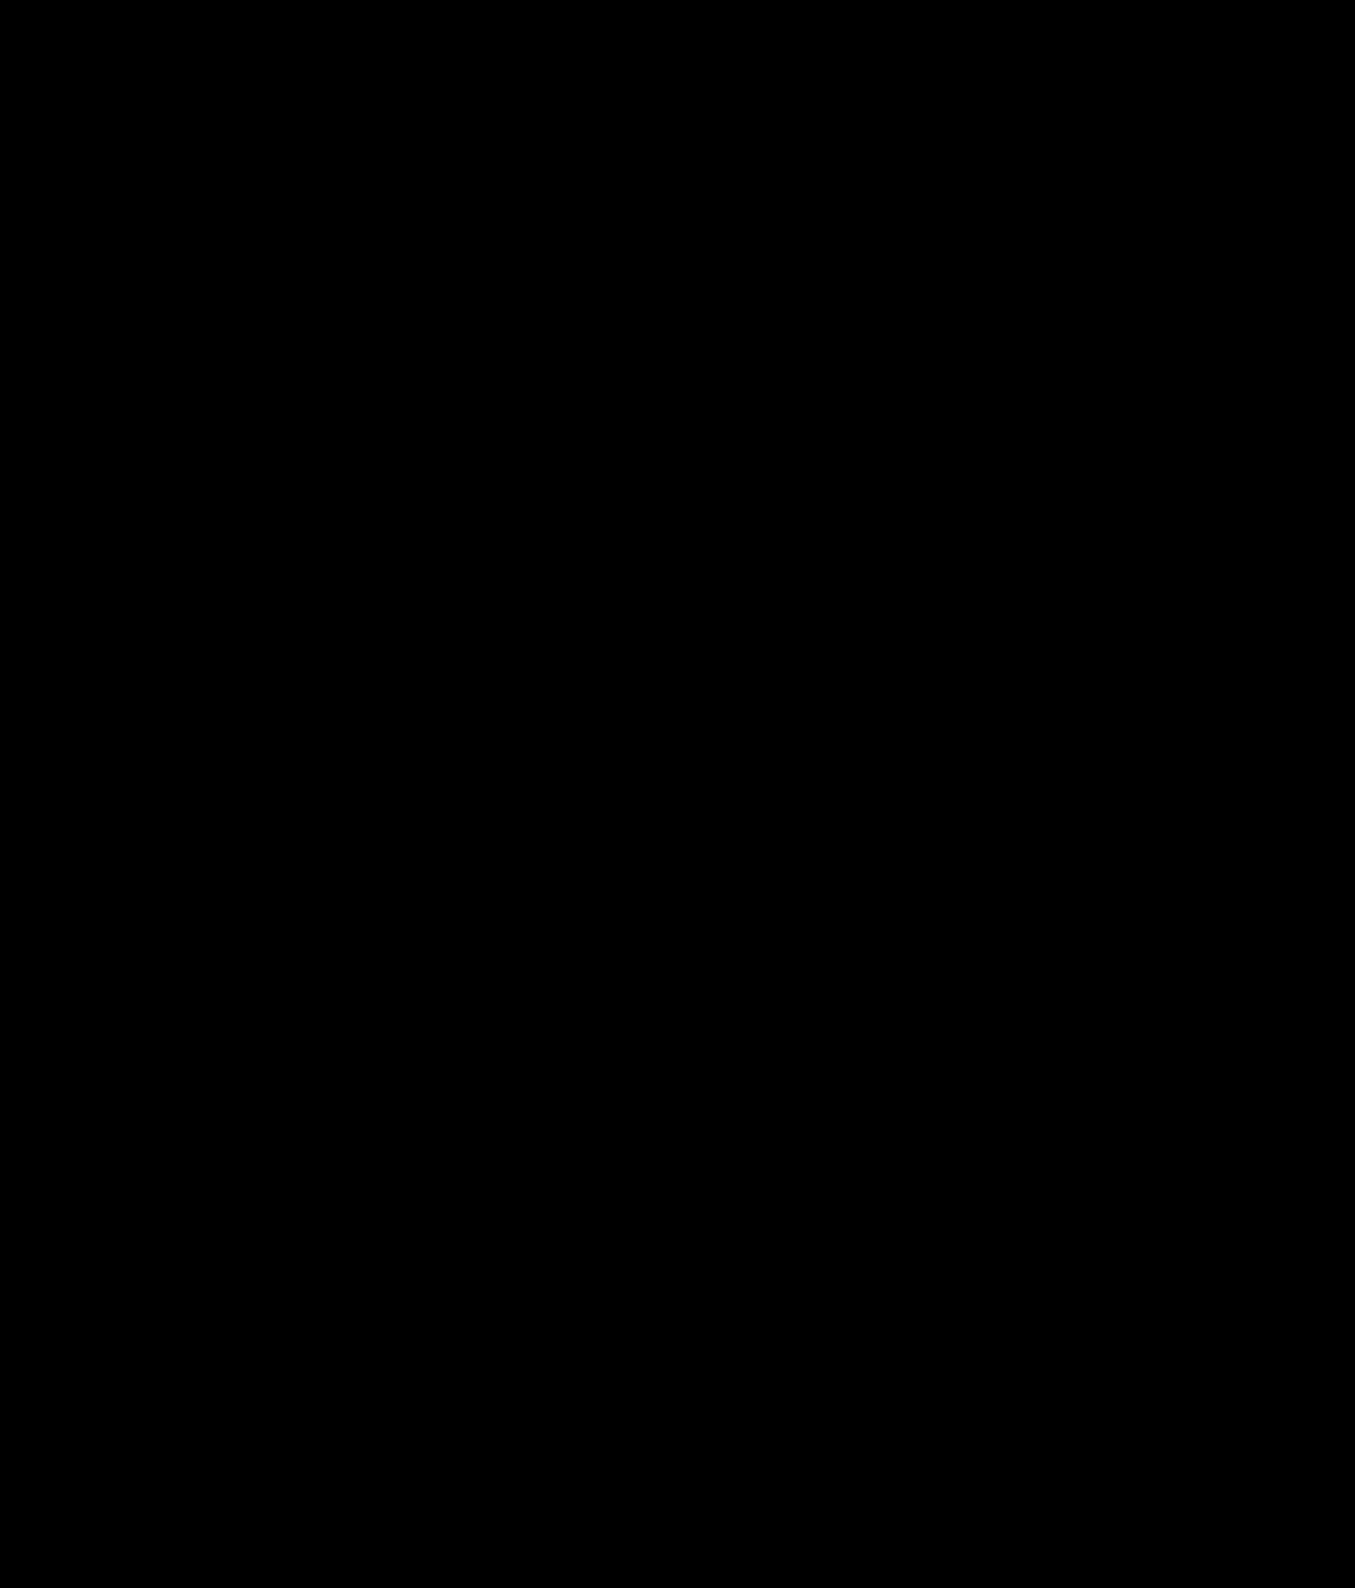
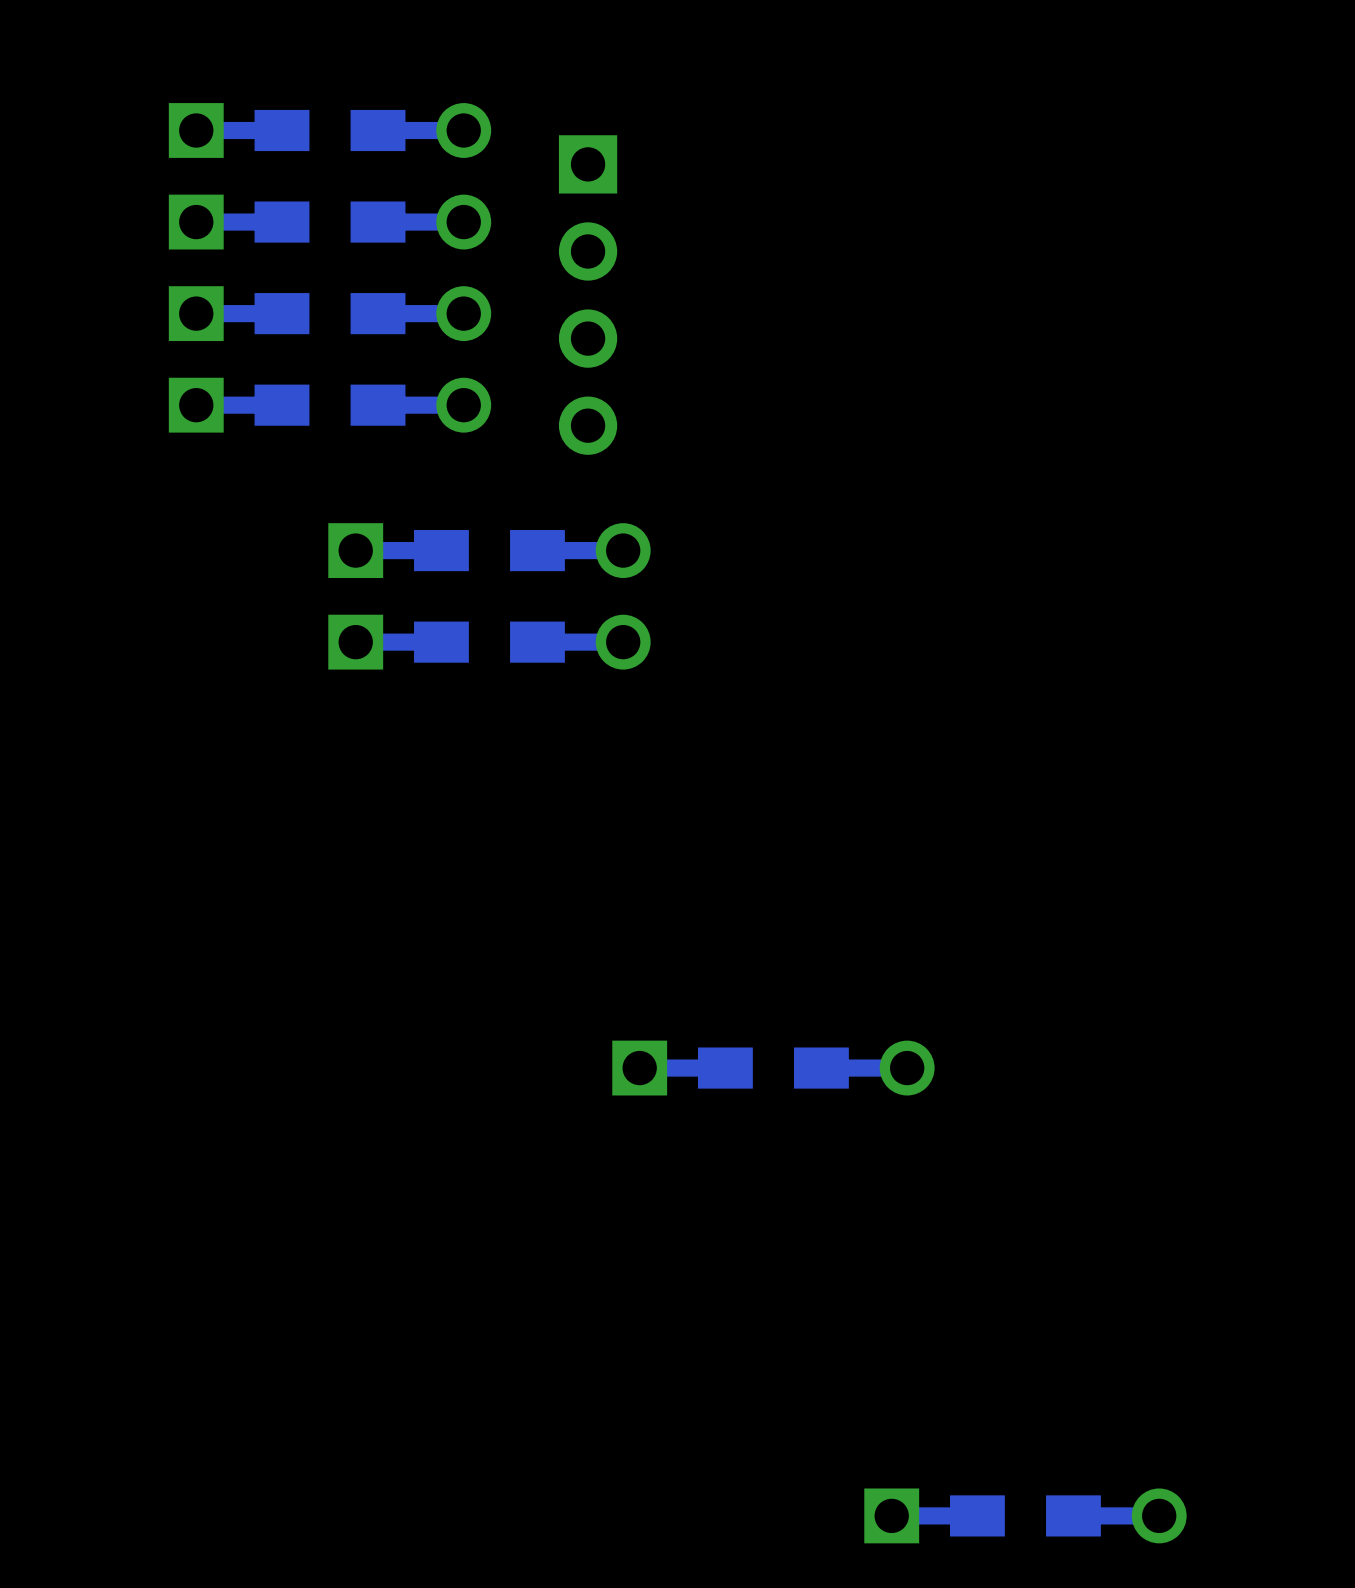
part: none -> (330, 130)
part: none -> (330, 222)
part: none -> (588, 295)
part: none -> (330, 313)
part: none -> (330, 405)
part: none -> (489, 550)
part: none -> (489, 642)
part: none -> (773, 1068)
part: none -> (1025, 1515)

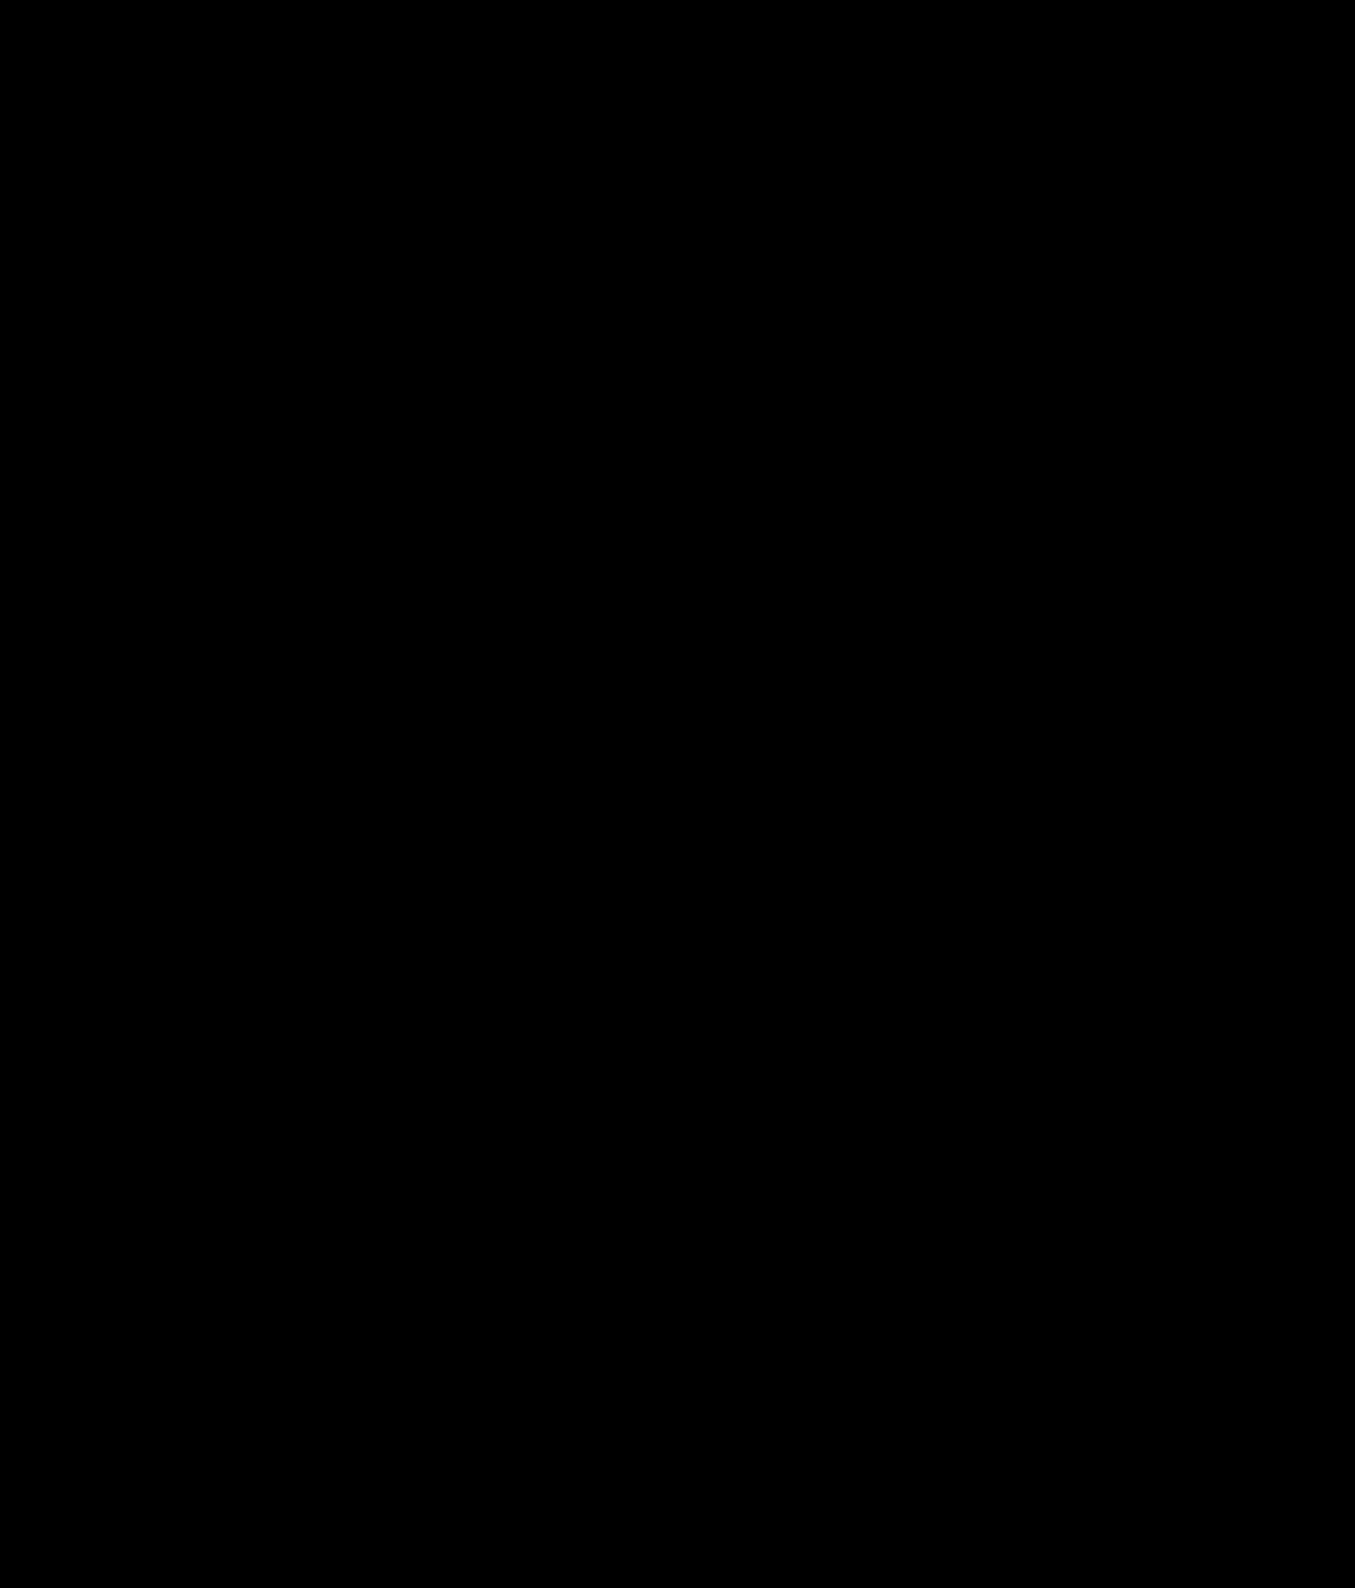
part: (330, 130) -> none
part: (330, 222) -> none
part: (588, 295) -> none
part: (330, 313) -> none
part: (330, 405) -> none
part: (489, 550) -> none
part: (489, 642) -> none
part: (773, 1068) -> none
part: (1025, 1515) -> none

